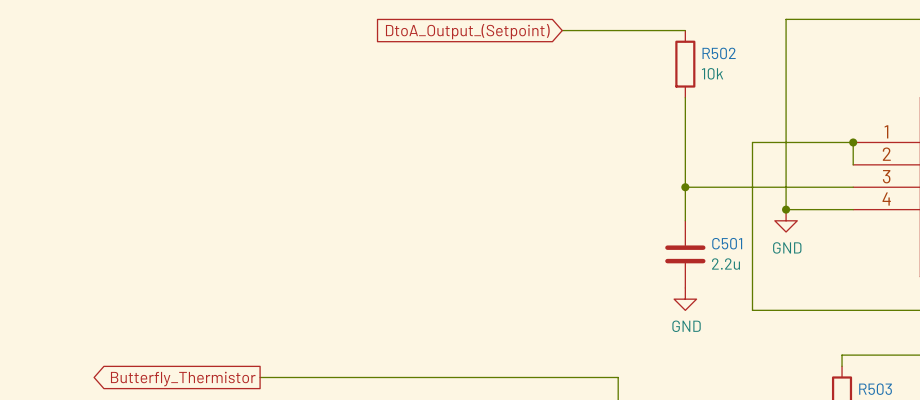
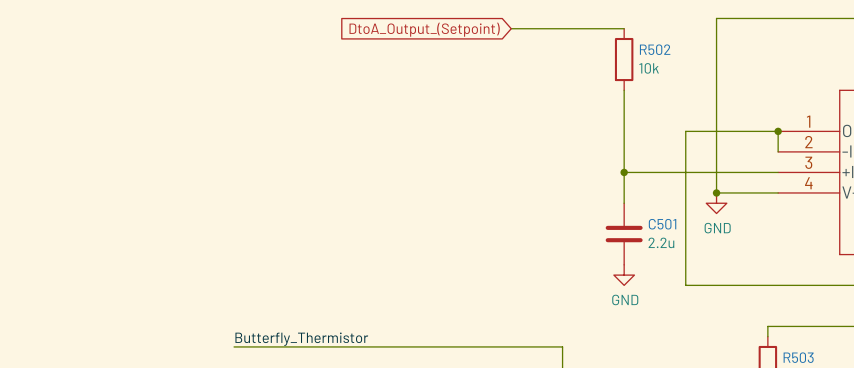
label: none -> Butterfly_Thermistor (301, 339)
global label: Butterfly_Thermistor (183, 379) -> none

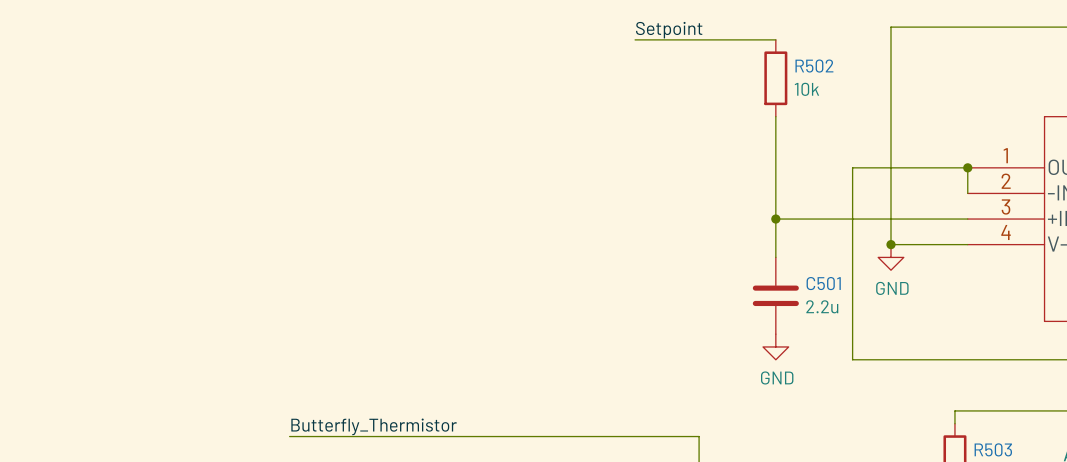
label: none -> Setpoint (669, 30)
global label: DtoA_Output_(Setpoint) (424, 29) -> none

